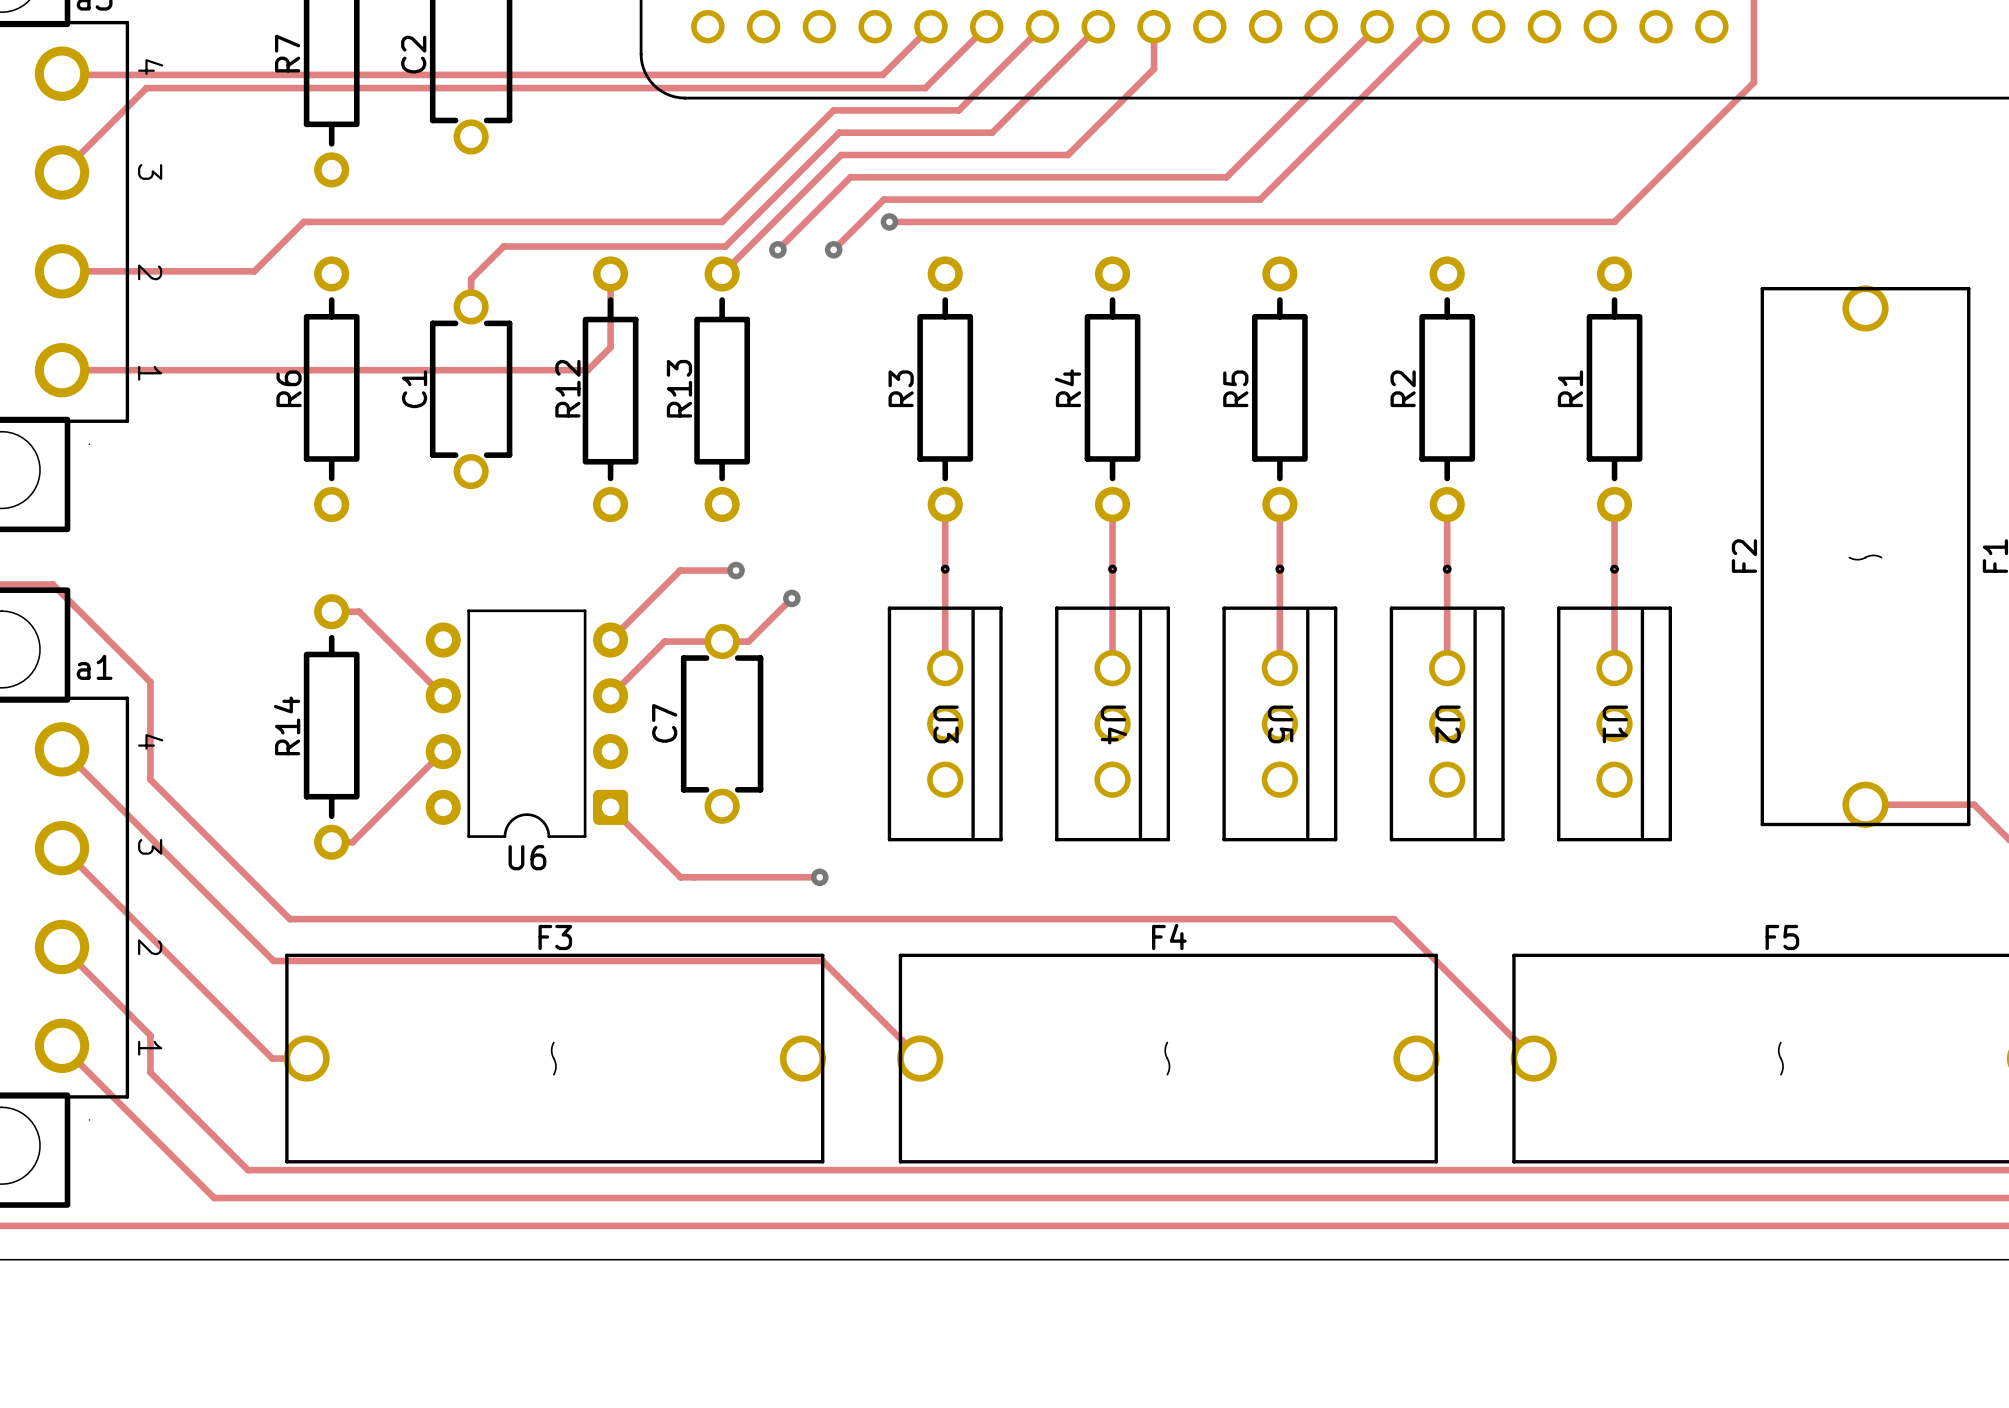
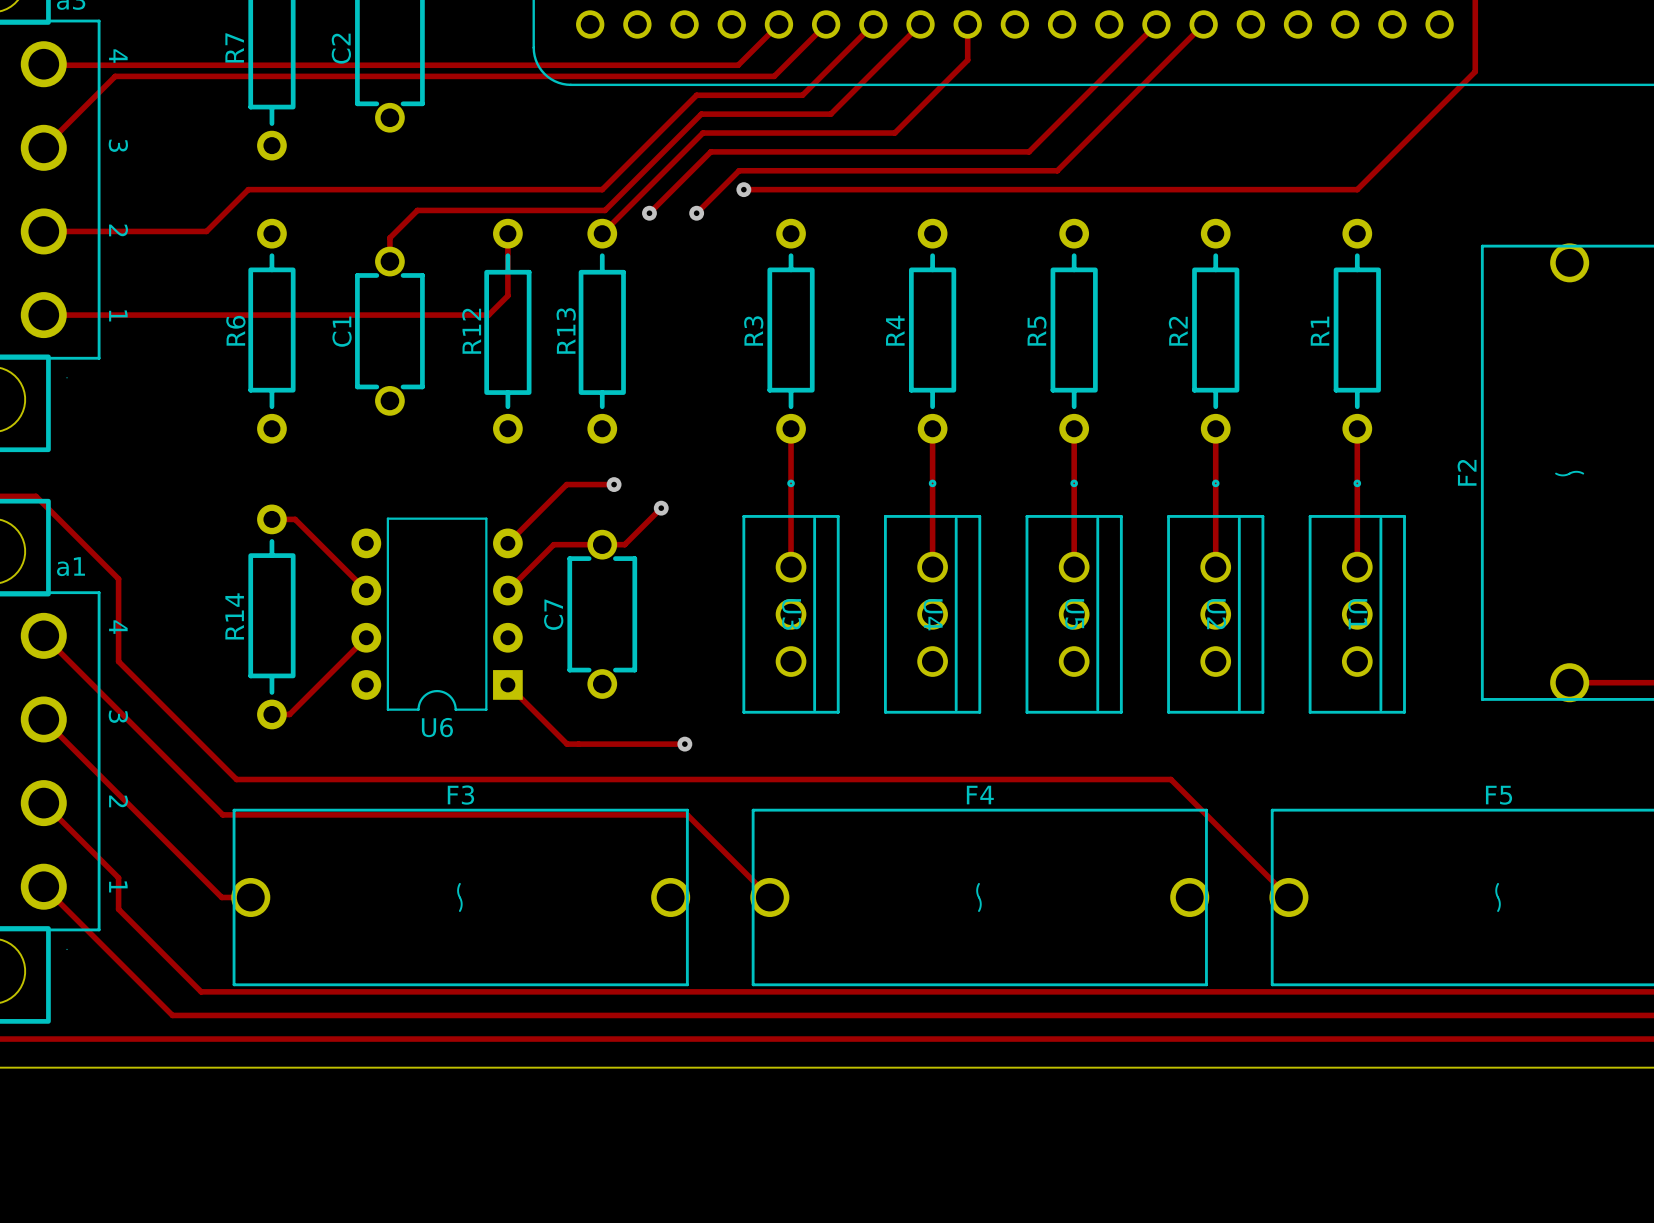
U6 footprint: [425, 609, 629, 838] -> [351, 517, 523, 711]

